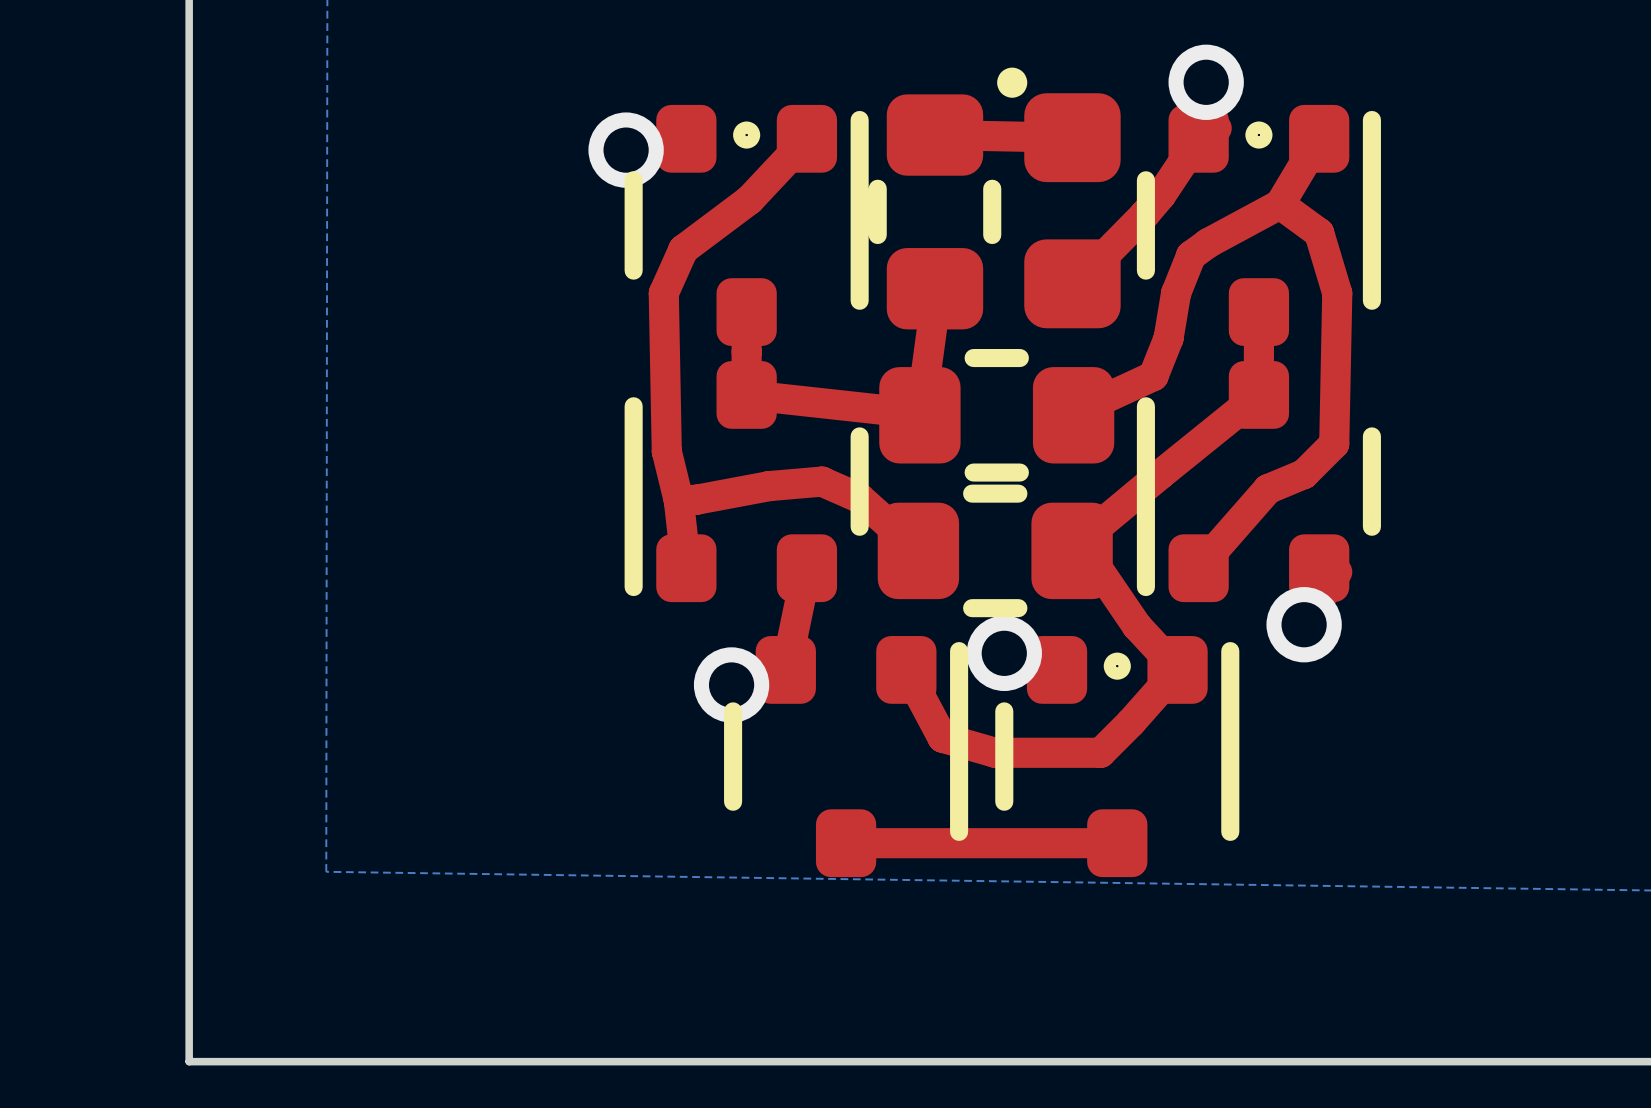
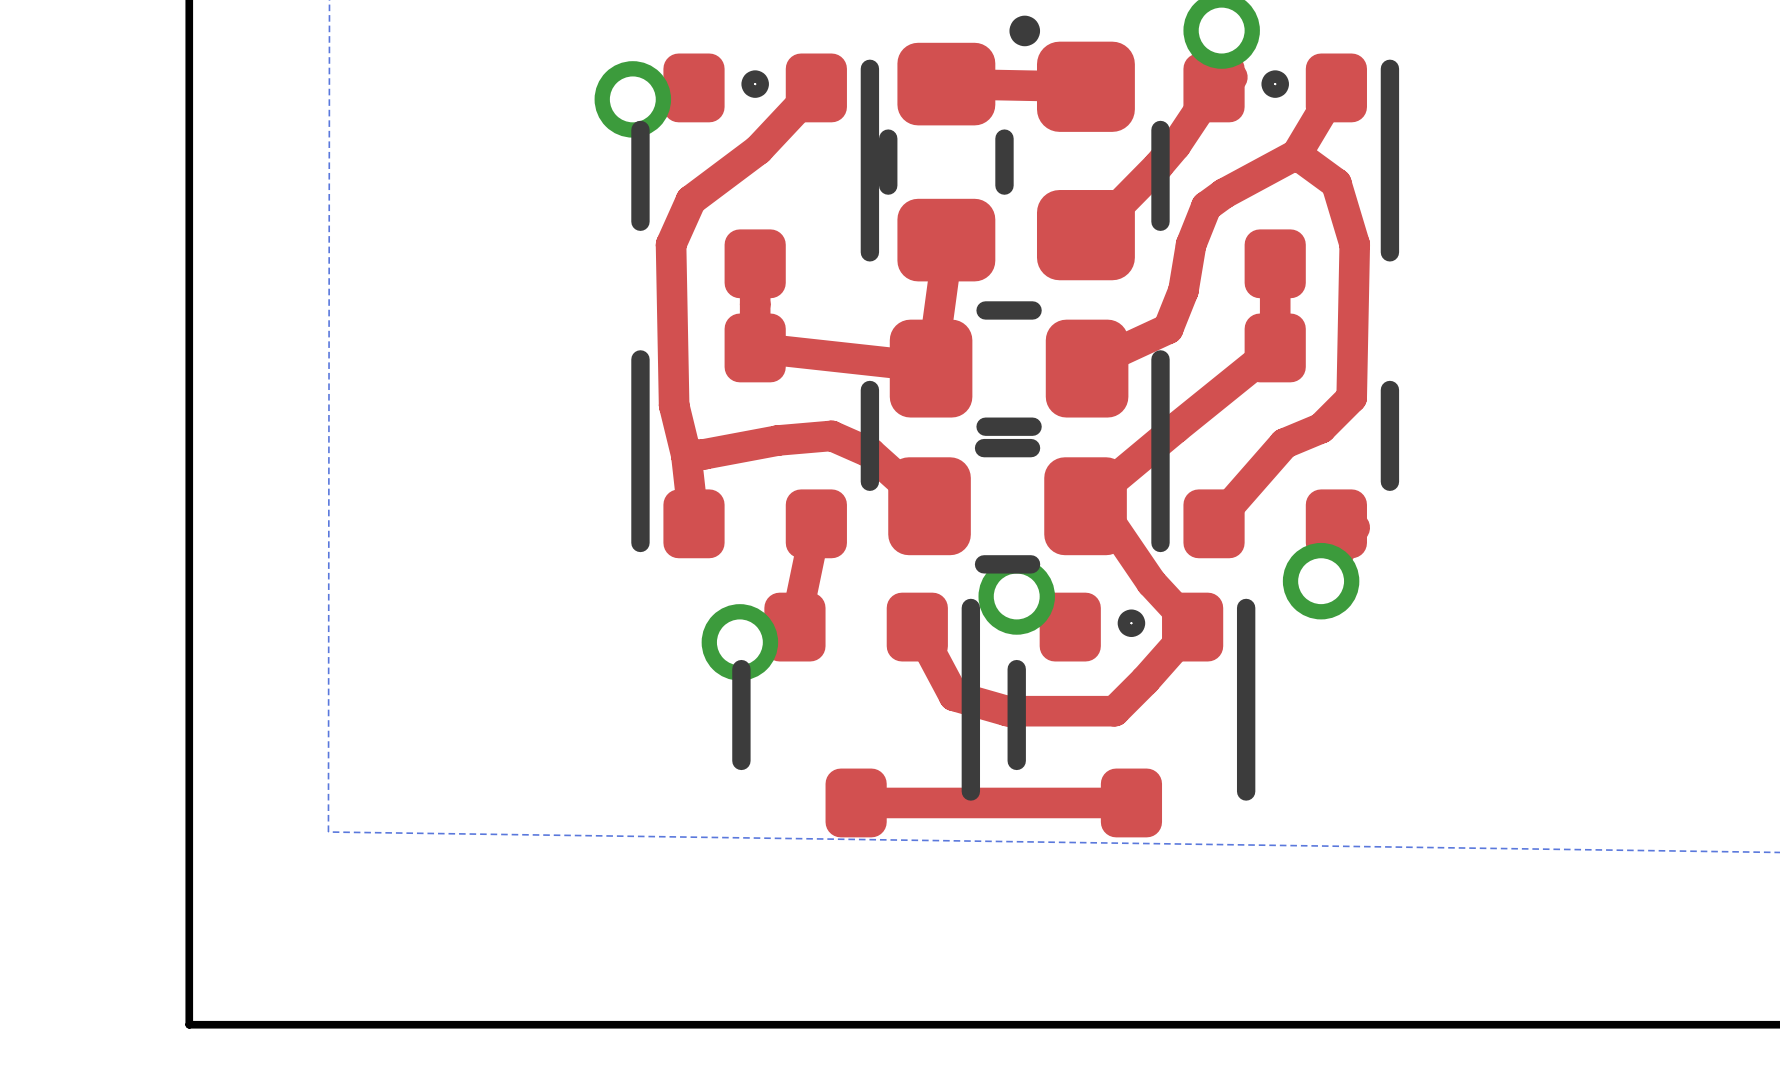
via position: (1004, 653) -> (1016, 596)

